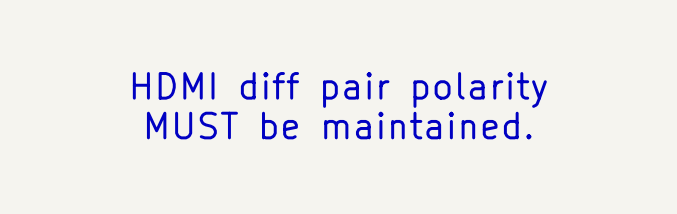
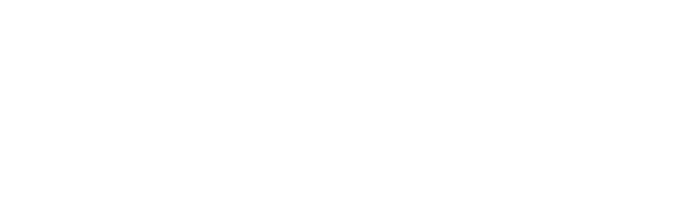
text: HDMI diff pair polarity (339, 89) -> none
text: MUST be maintained. (339, 125) -> none

